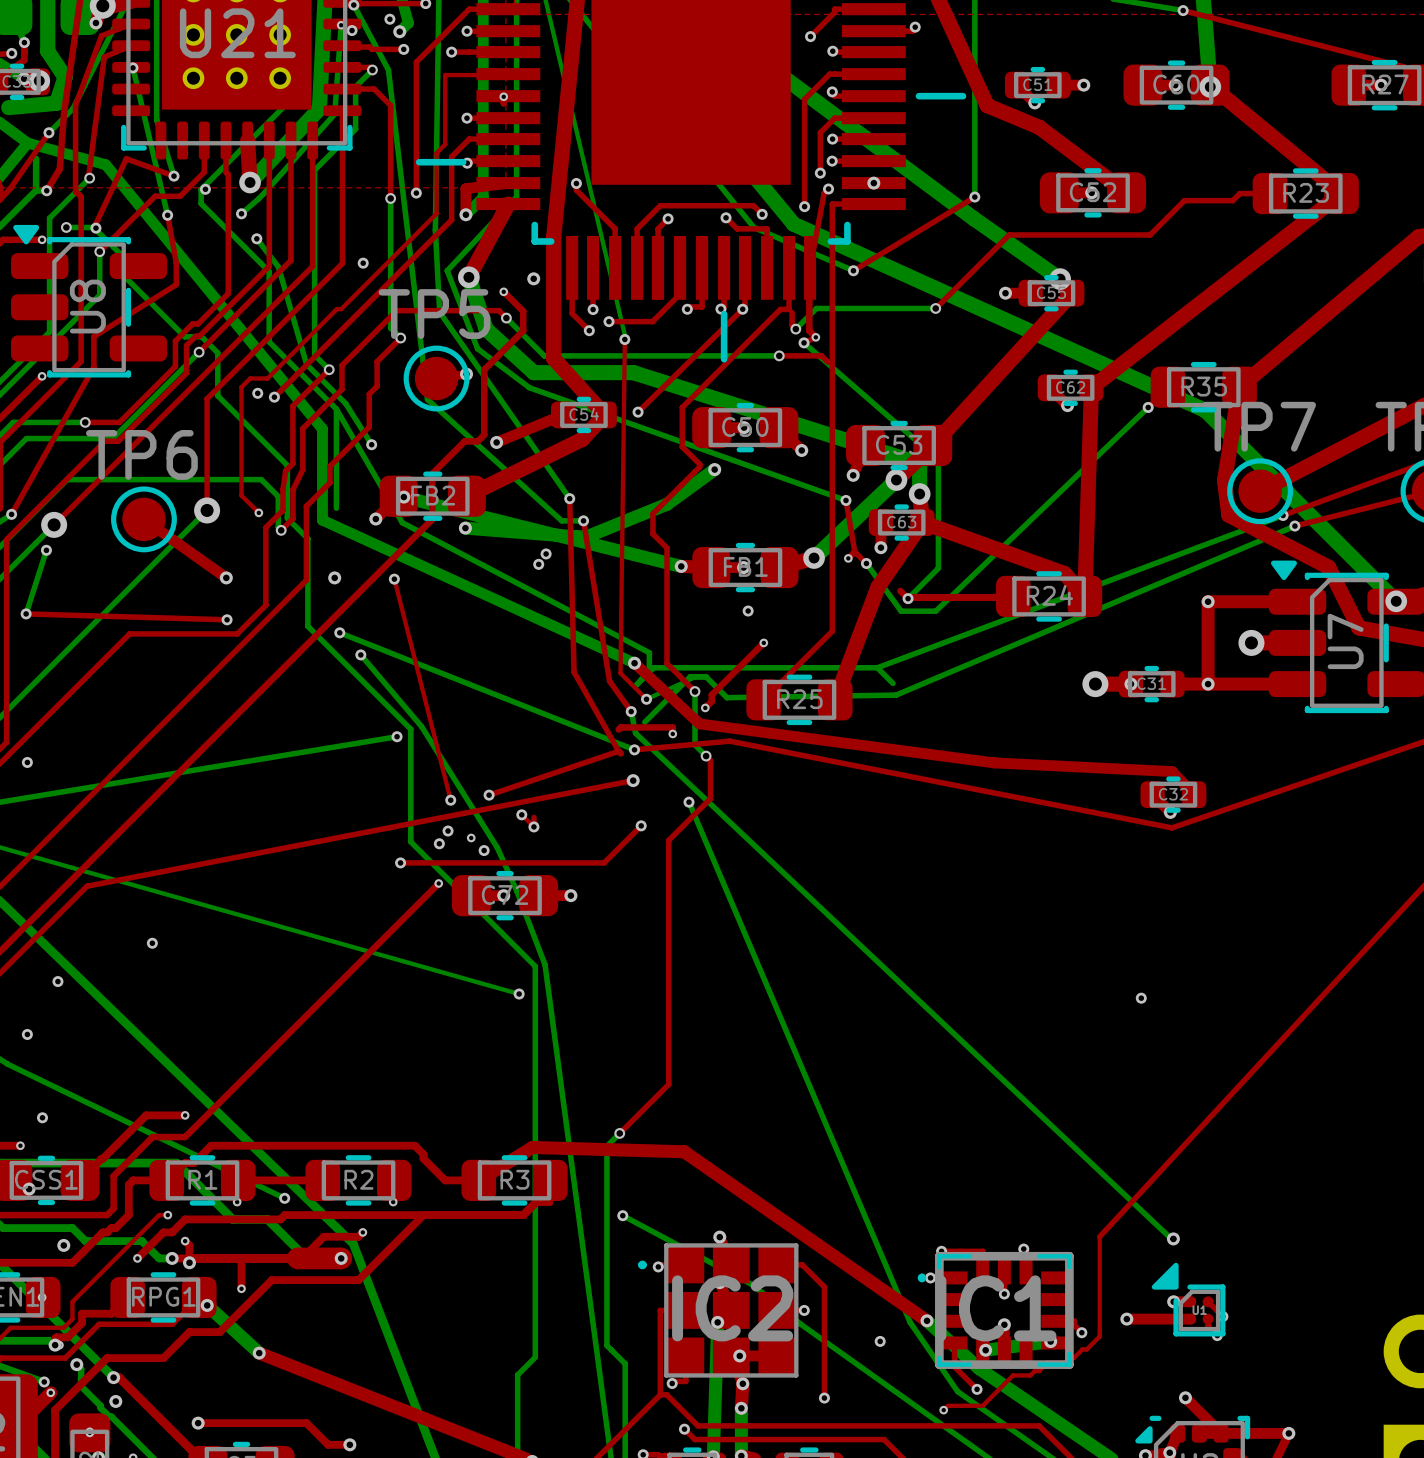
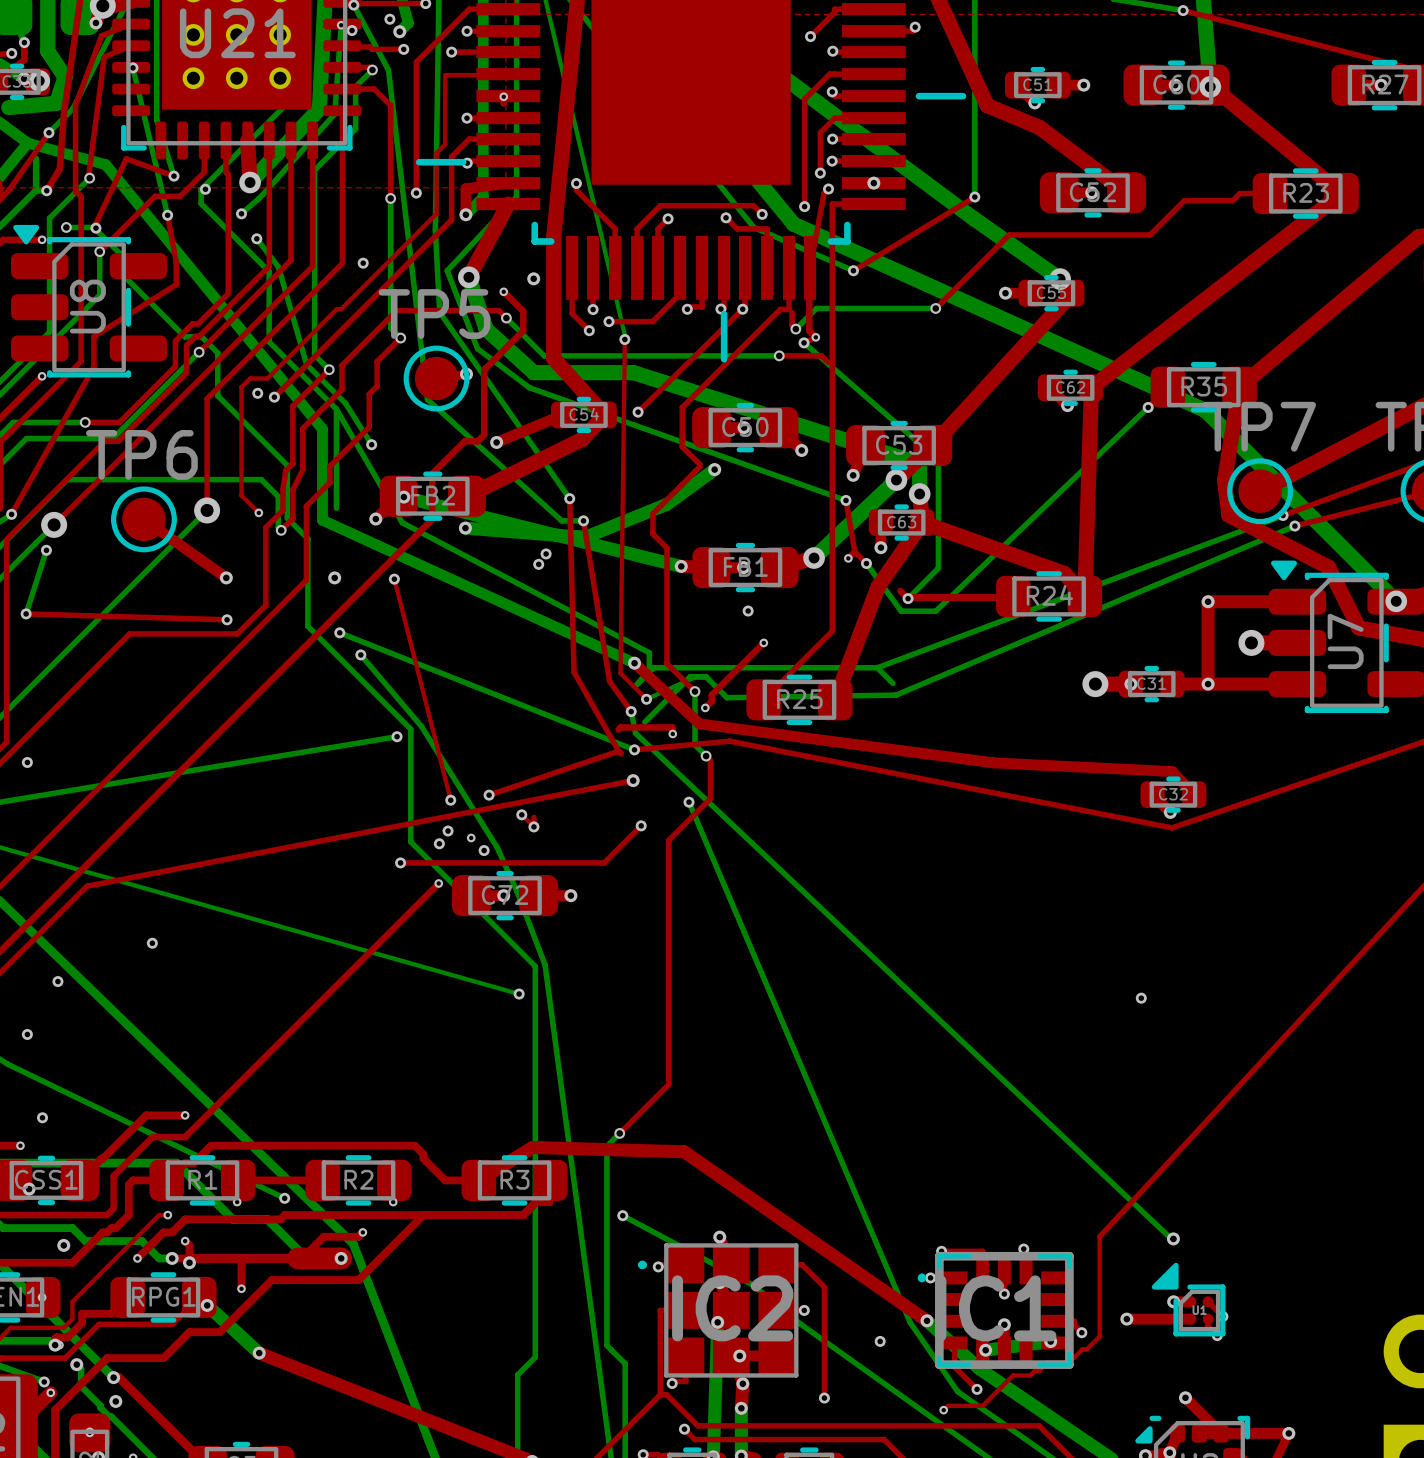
top track: (198, 1423) (306, 1423) (328, 1444) (349, 1444) -> none
via: (198, 1423) -> none
via: (349, 1444) -> none

